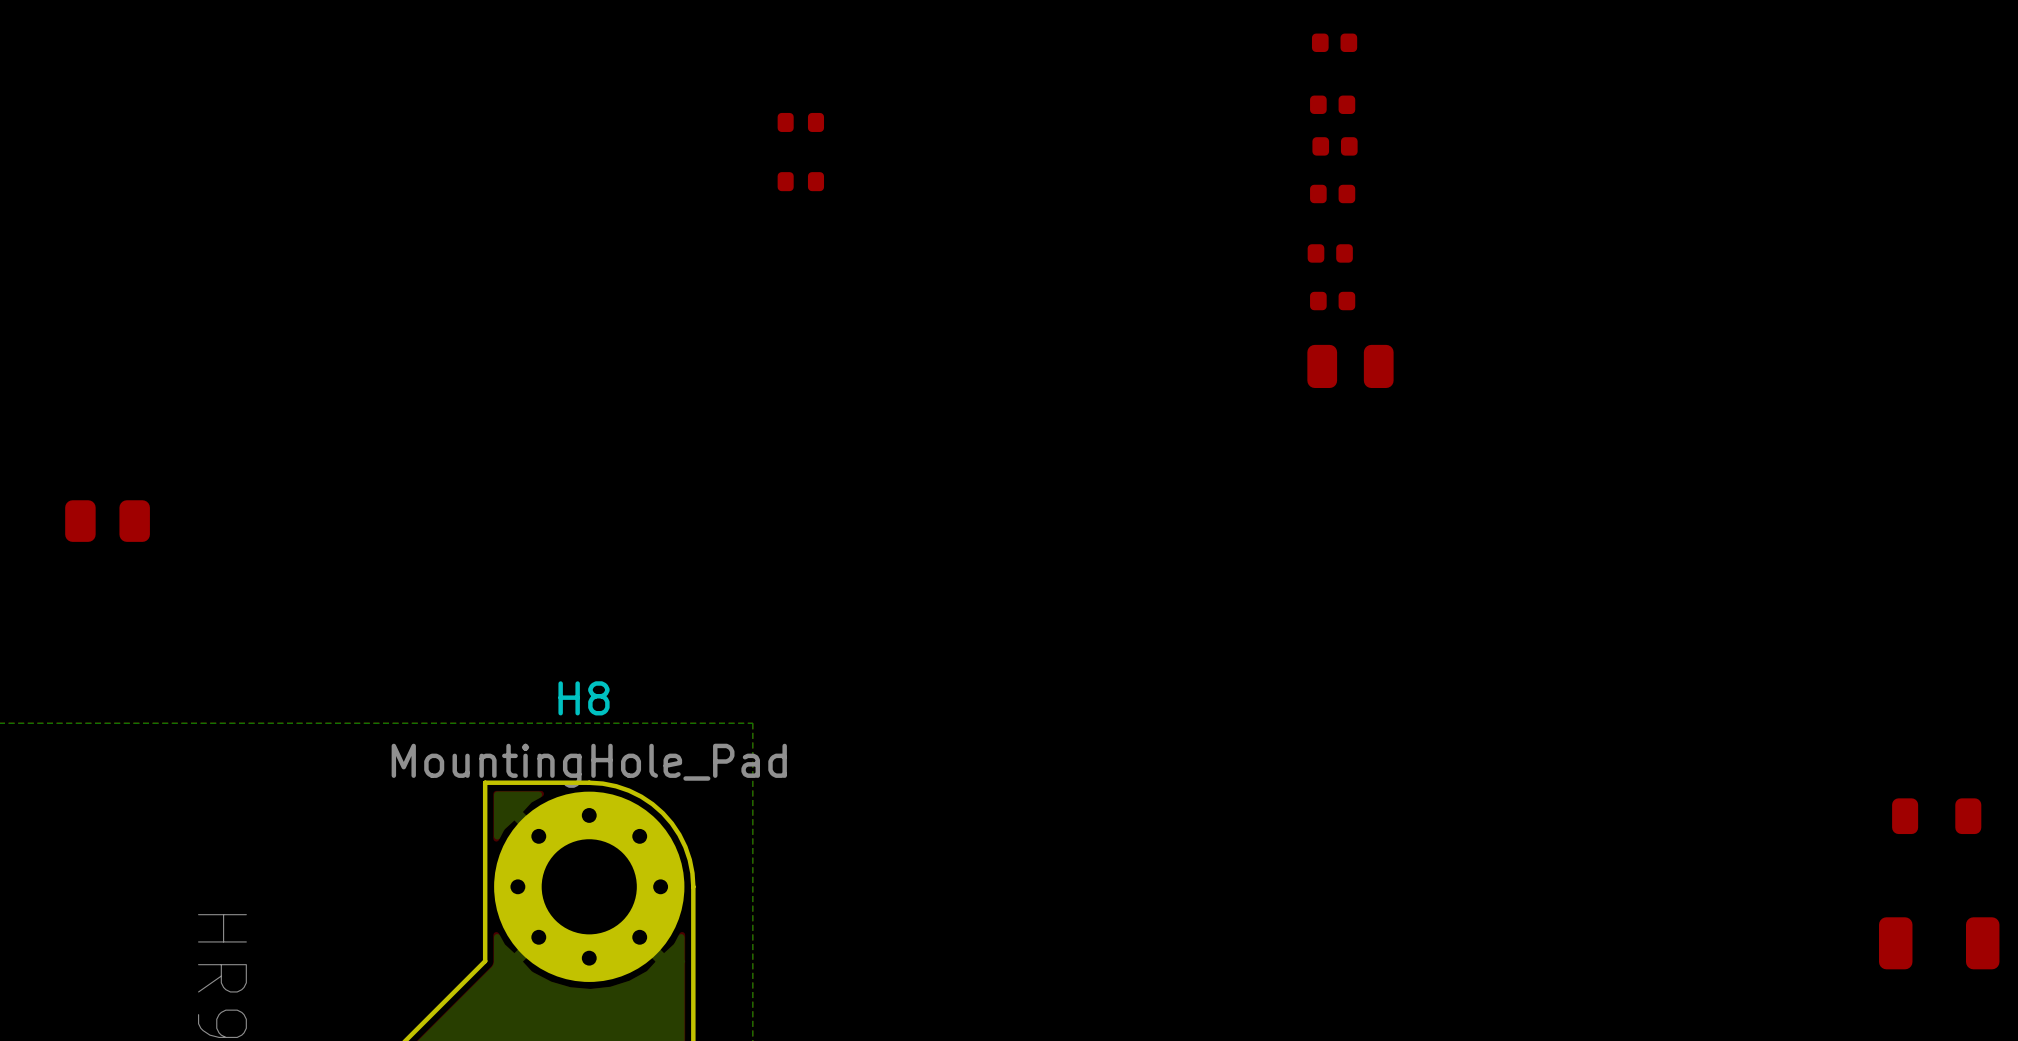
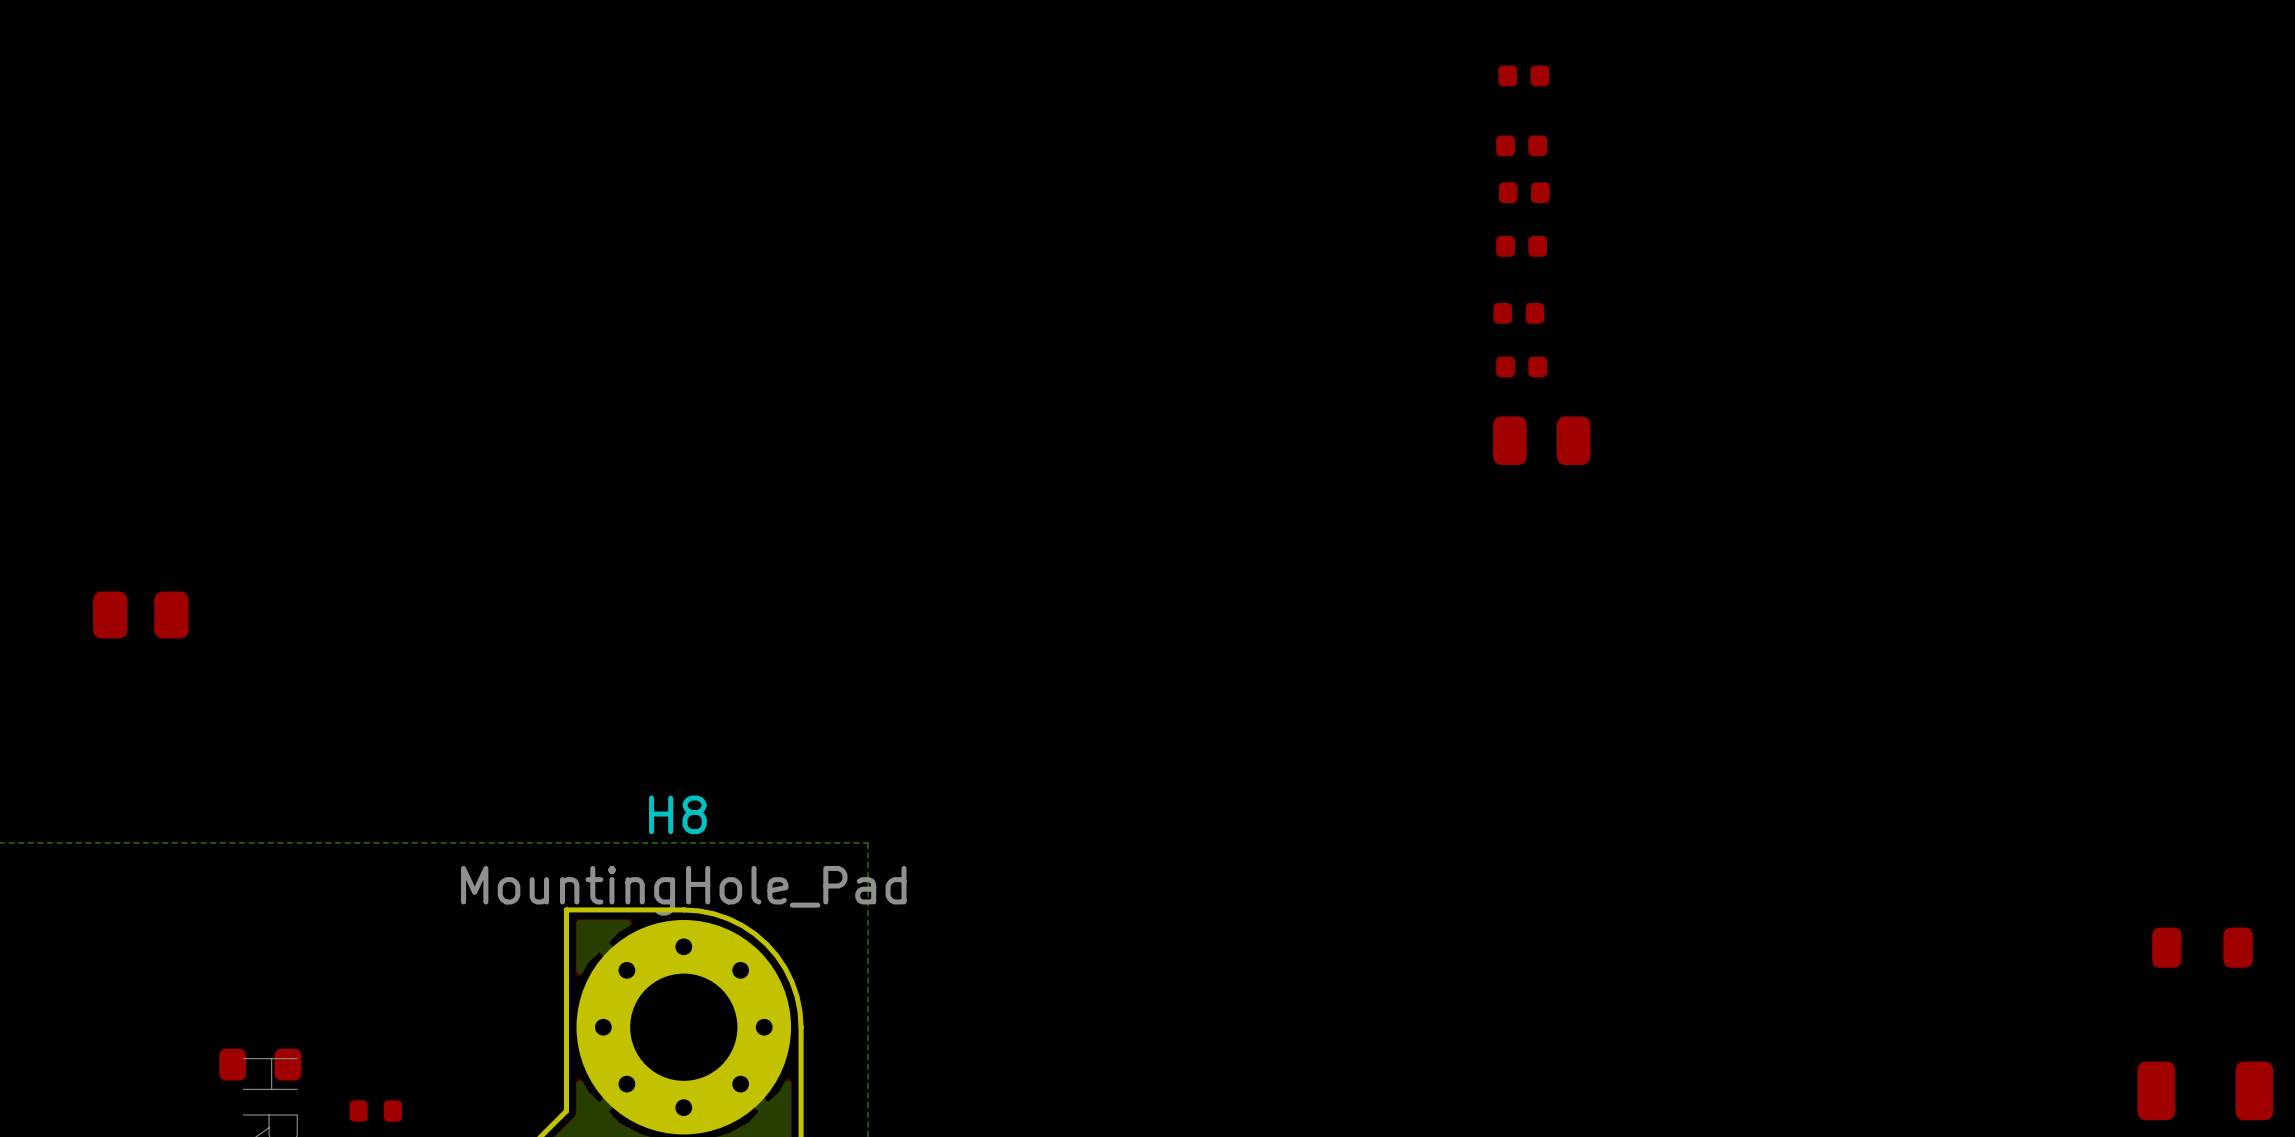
part: (800, 122) -> none
part: (800, 181) -> none
part: none -> (260, 1064)
part: none -> (375, 1111)

